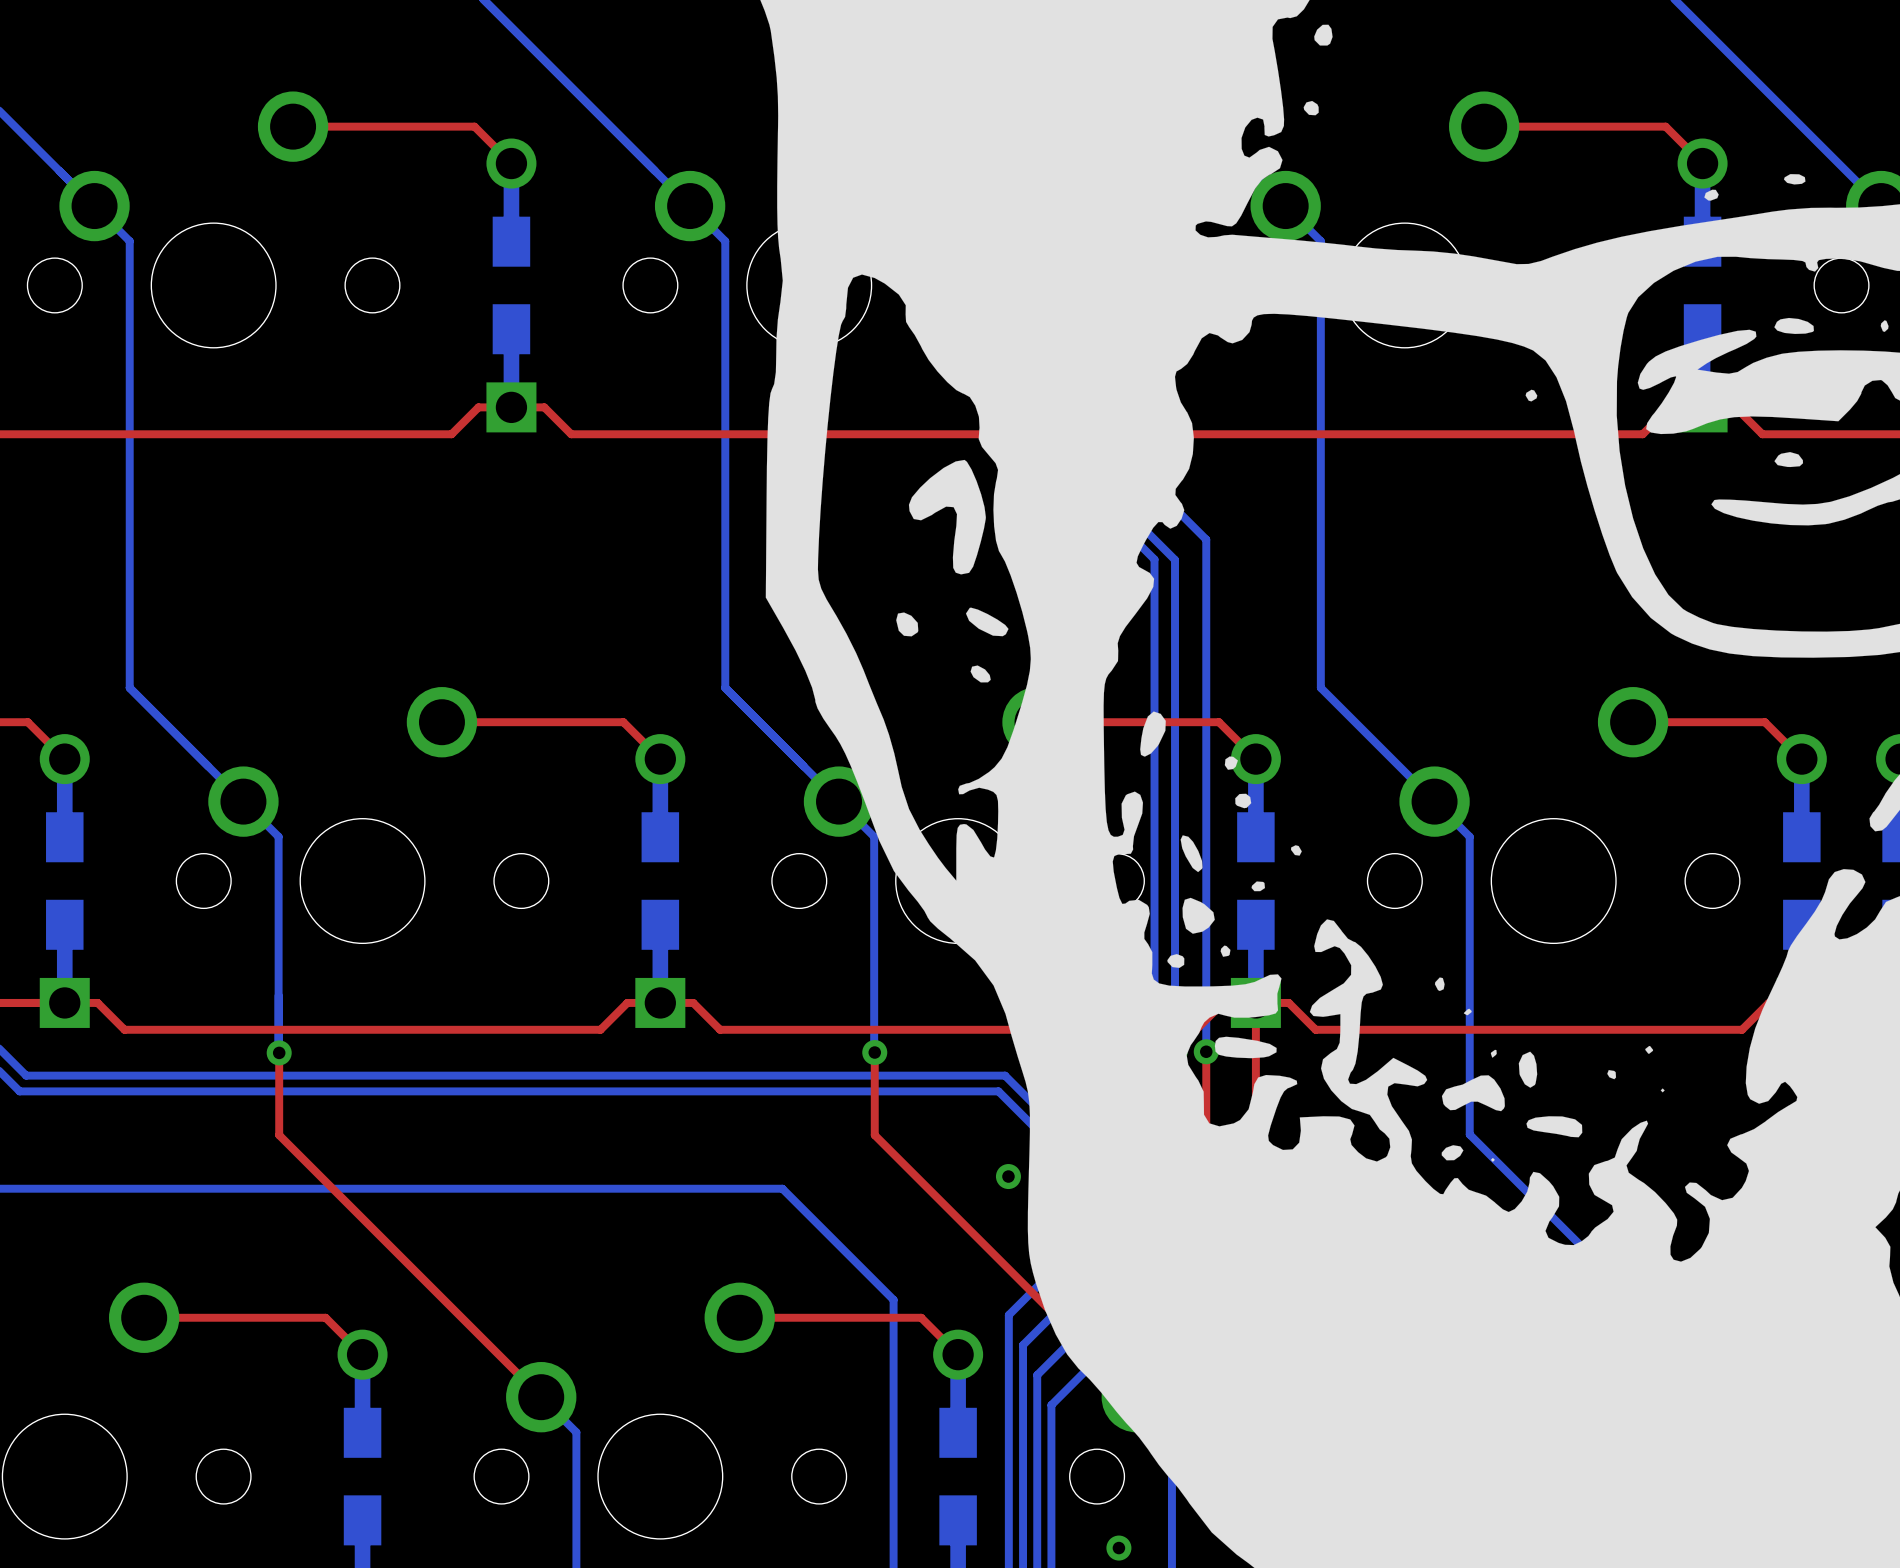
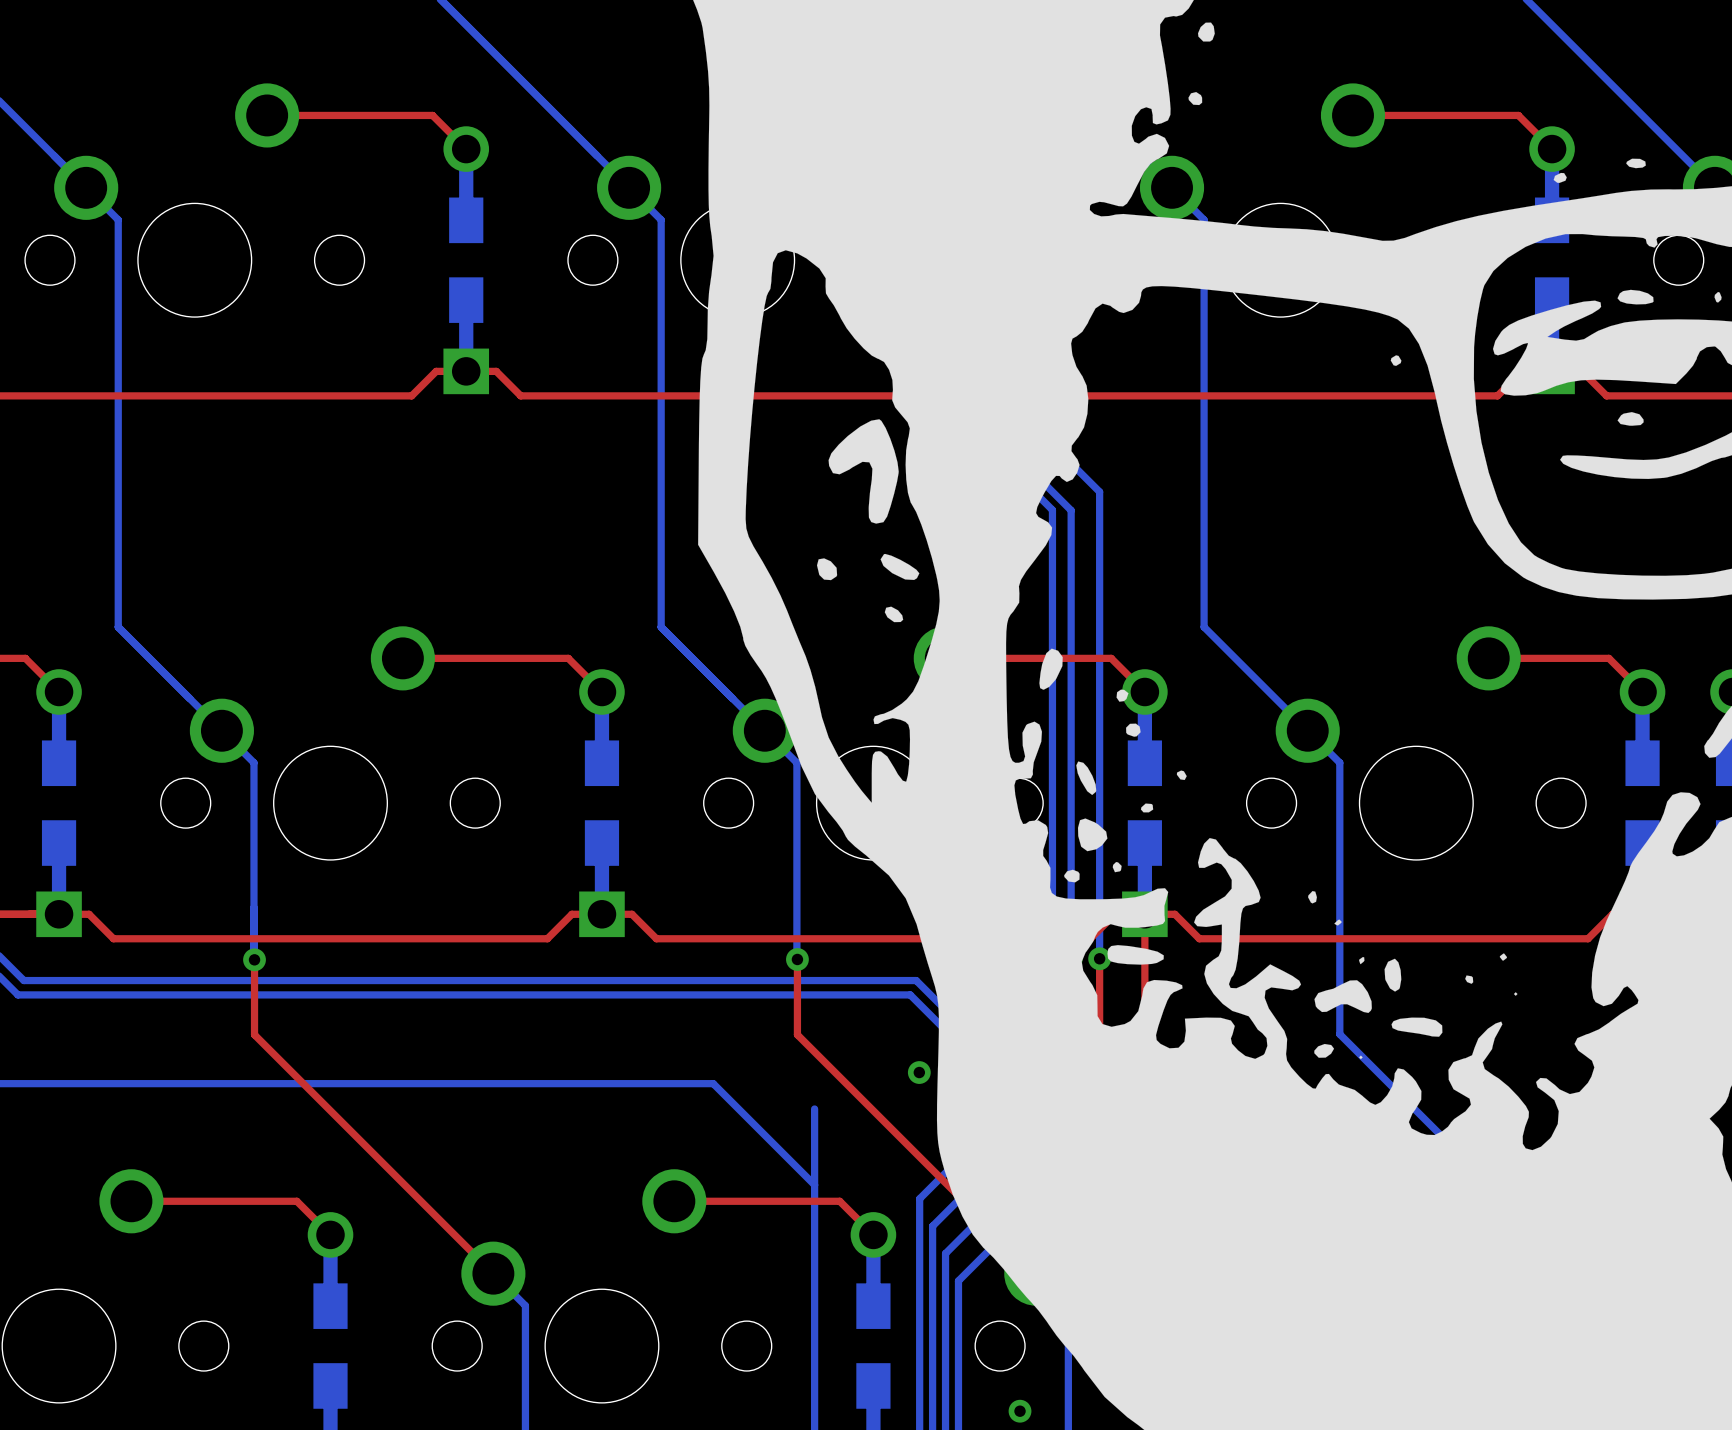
bottom track: none -> (814, 1108) (814, 1184)

